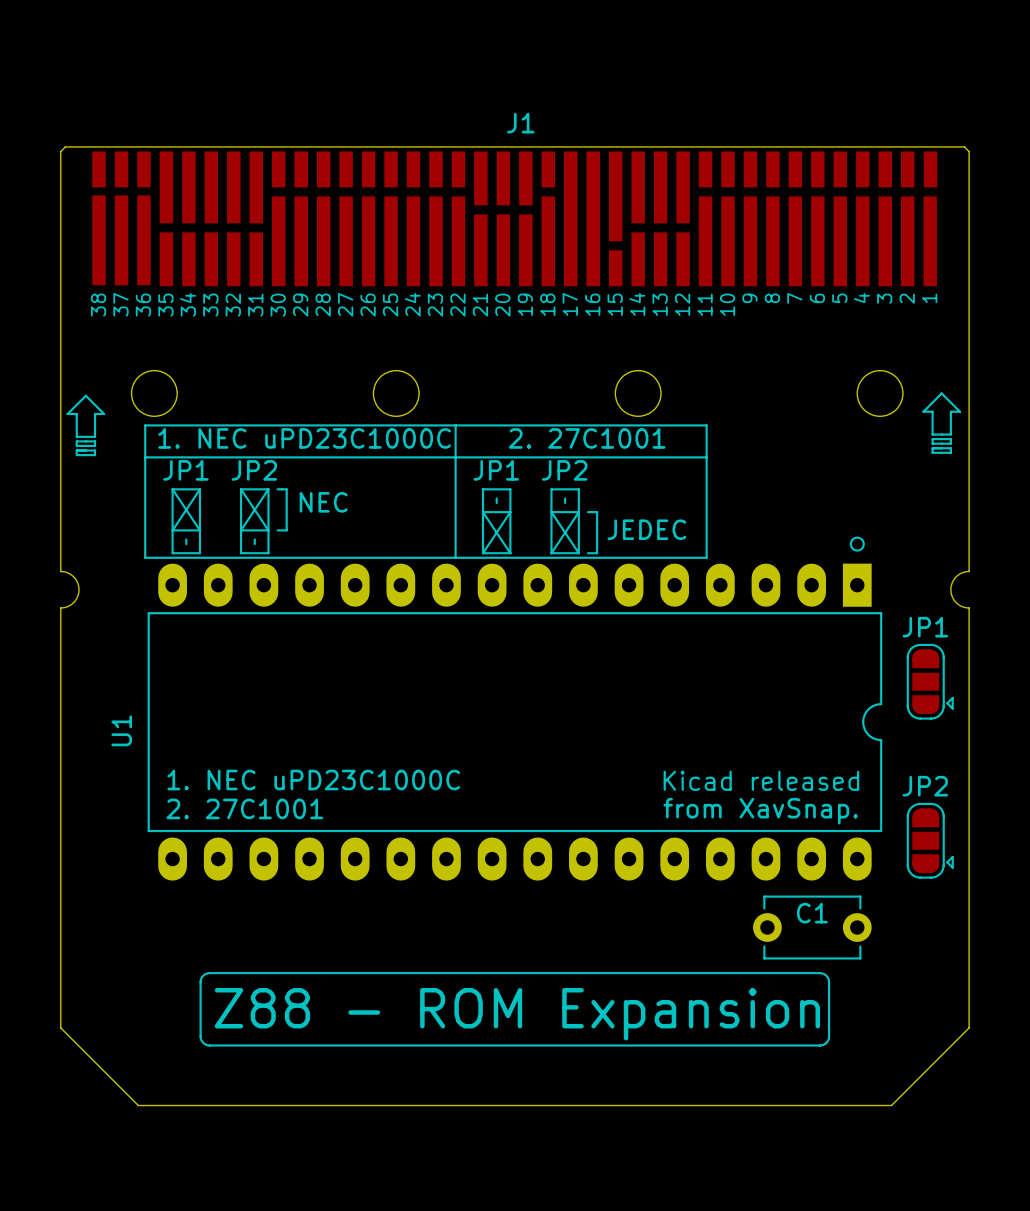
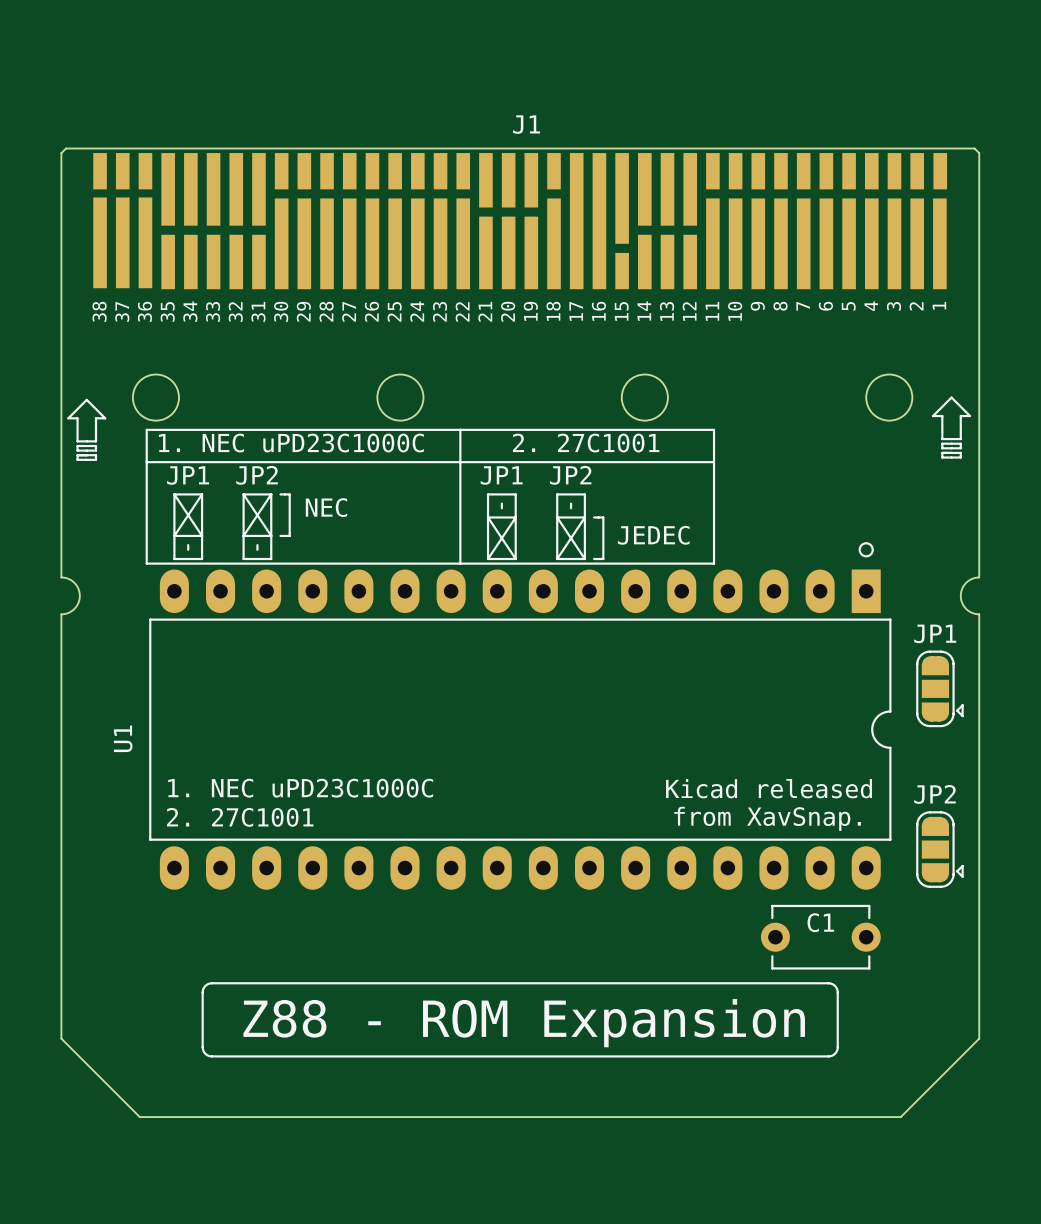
J1 footprint: [92, 151, 938, 287] -> [93, 153, 948, 290]

